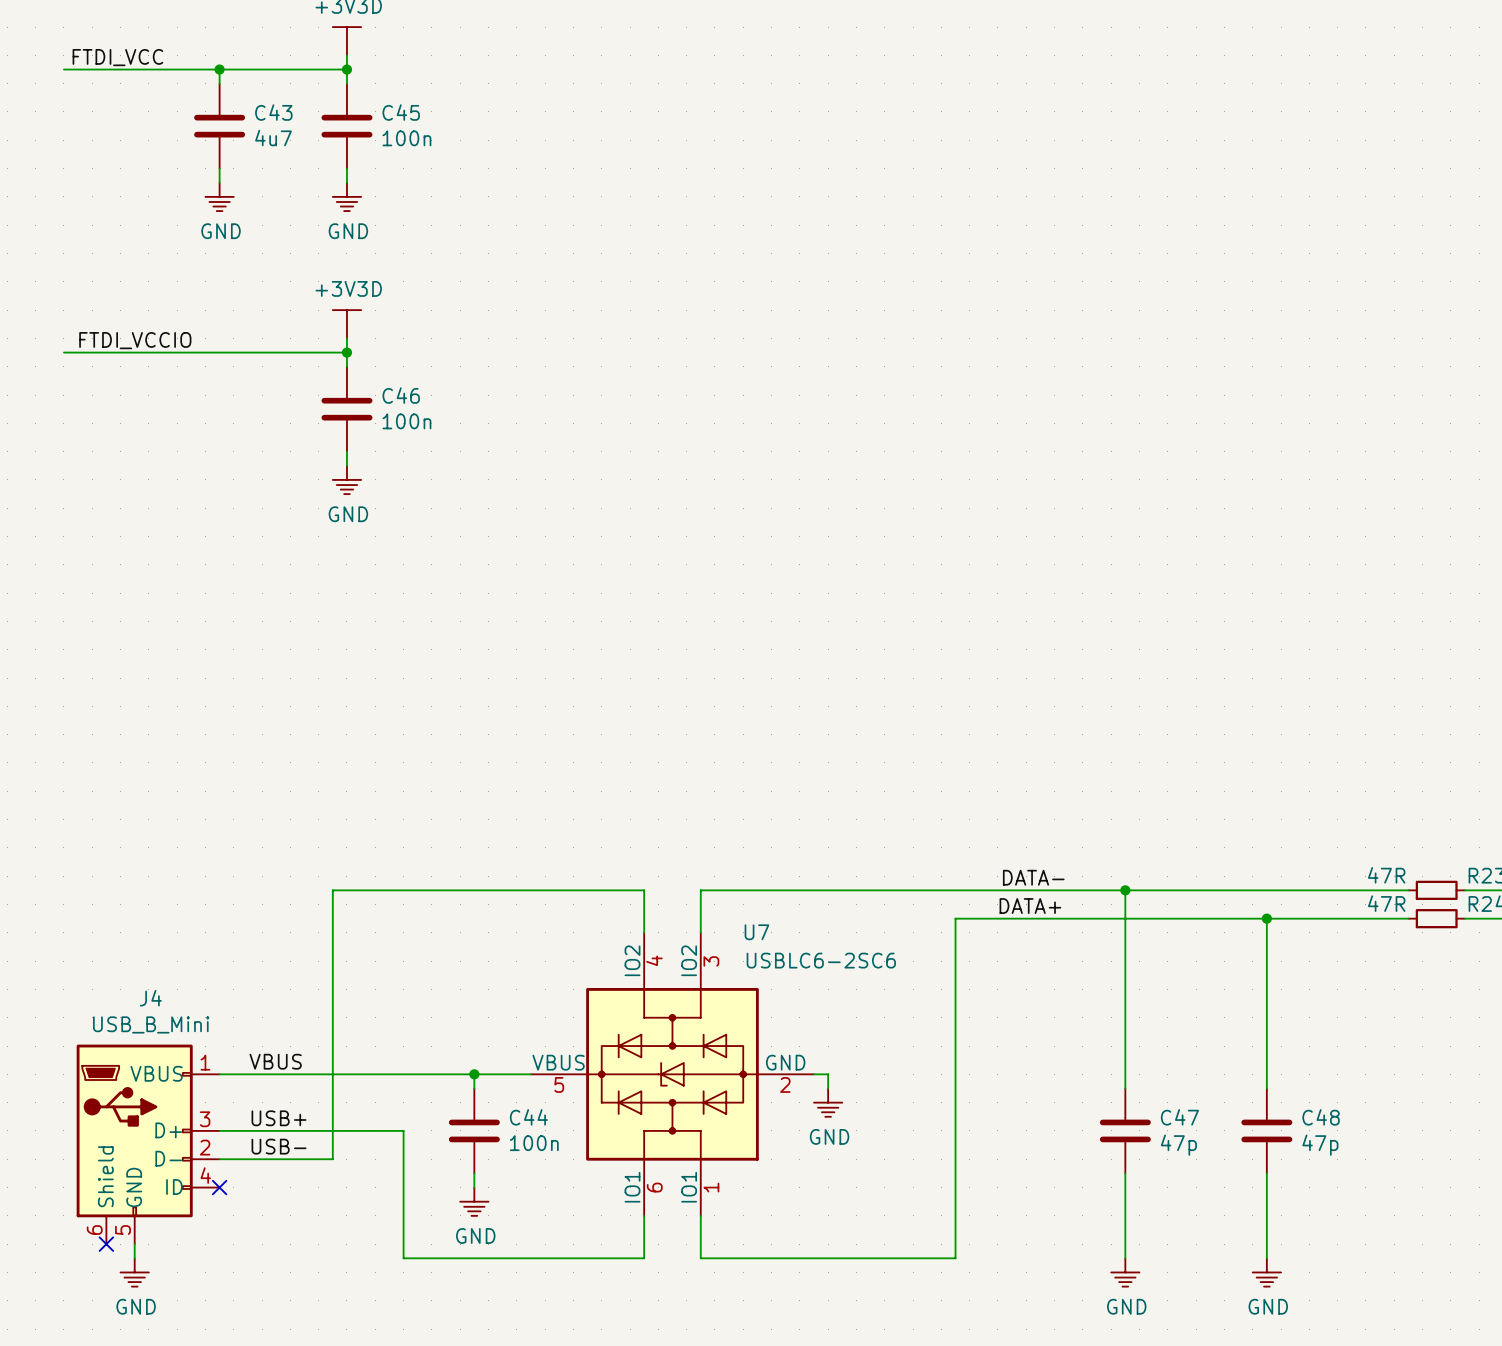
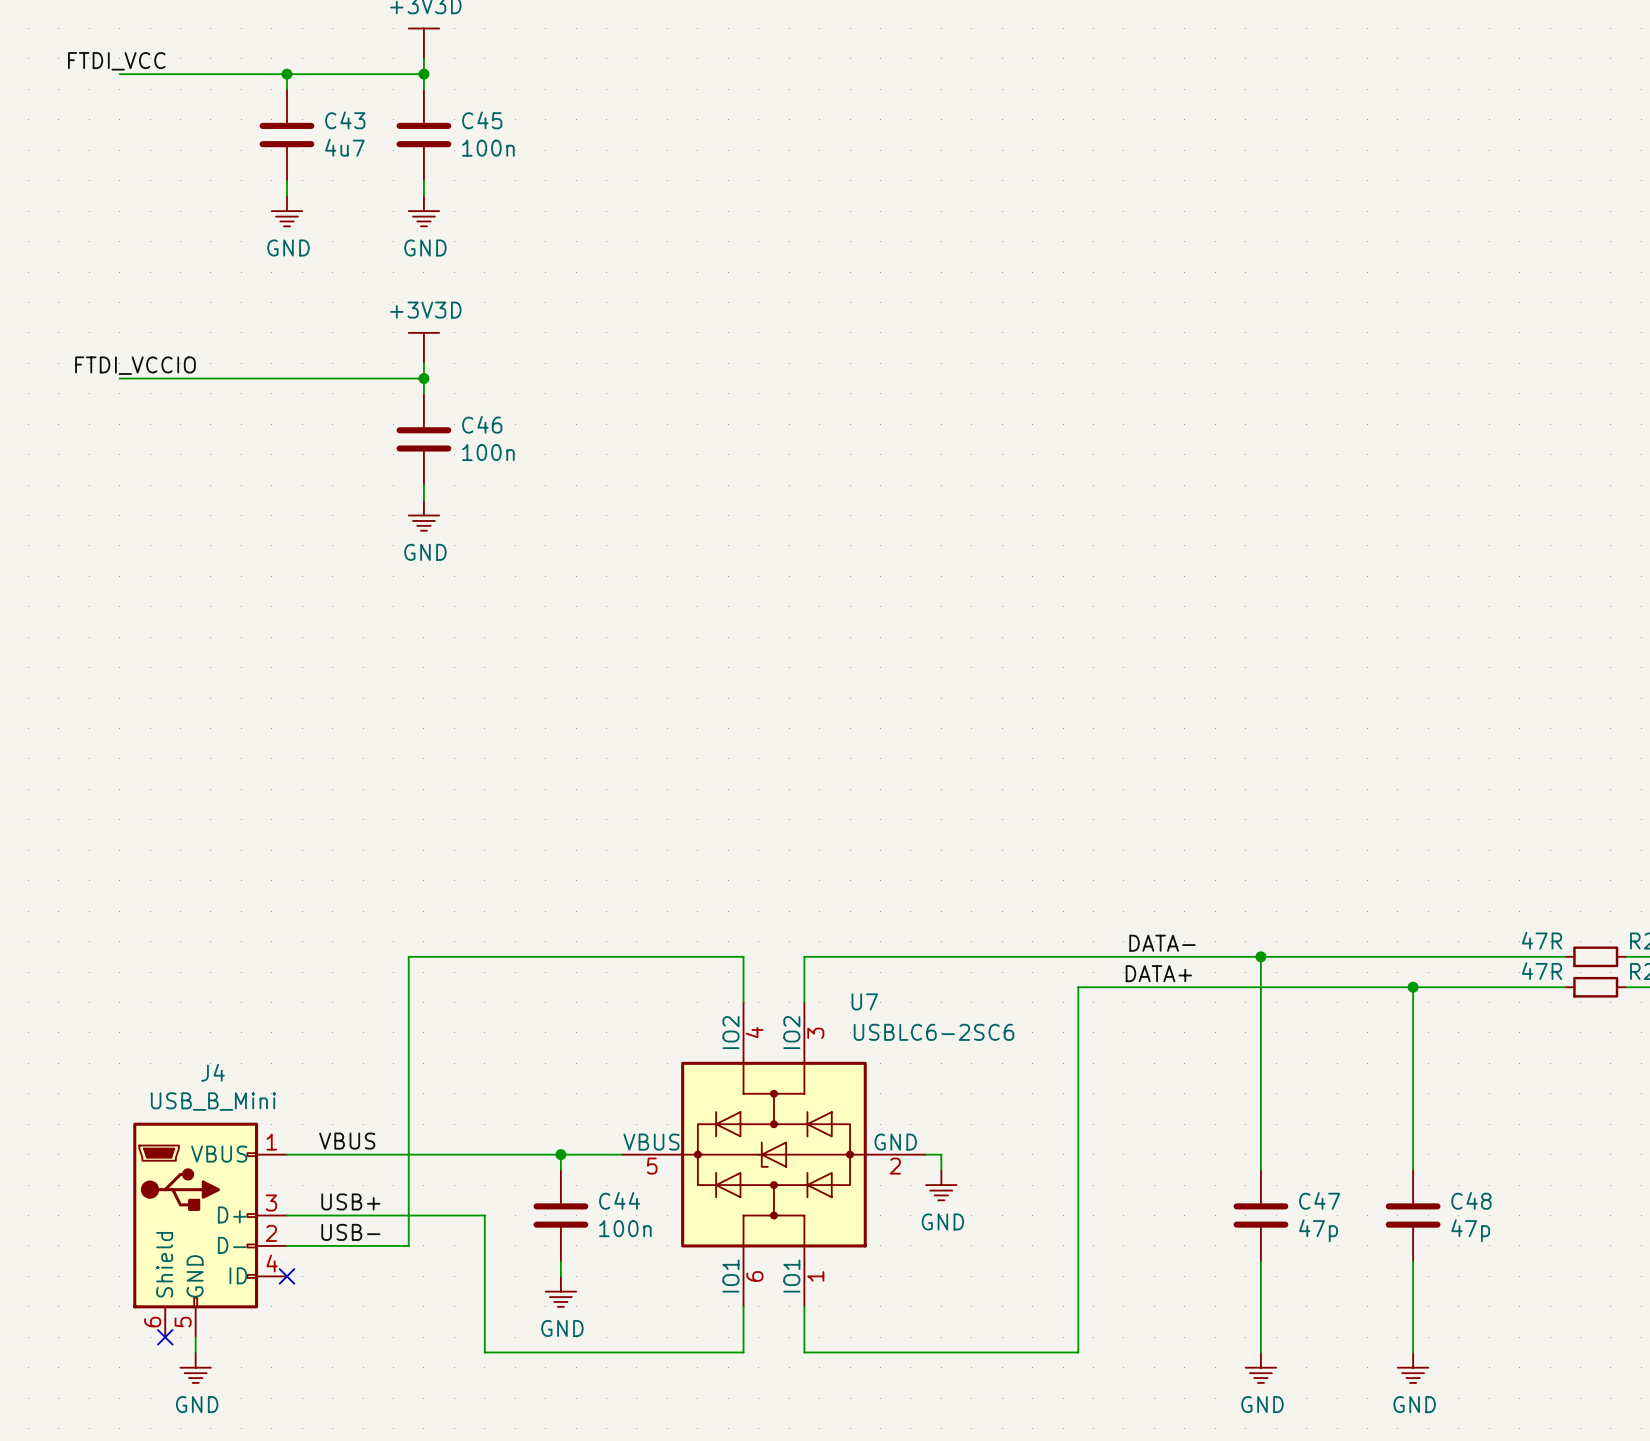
label position: FTDI_VCC (117, 57) -> FTDI_VCC (116, 61)
label position: FTDI_VCCIO (135, 340) -> FTDI_VCCIO (135, 365)

